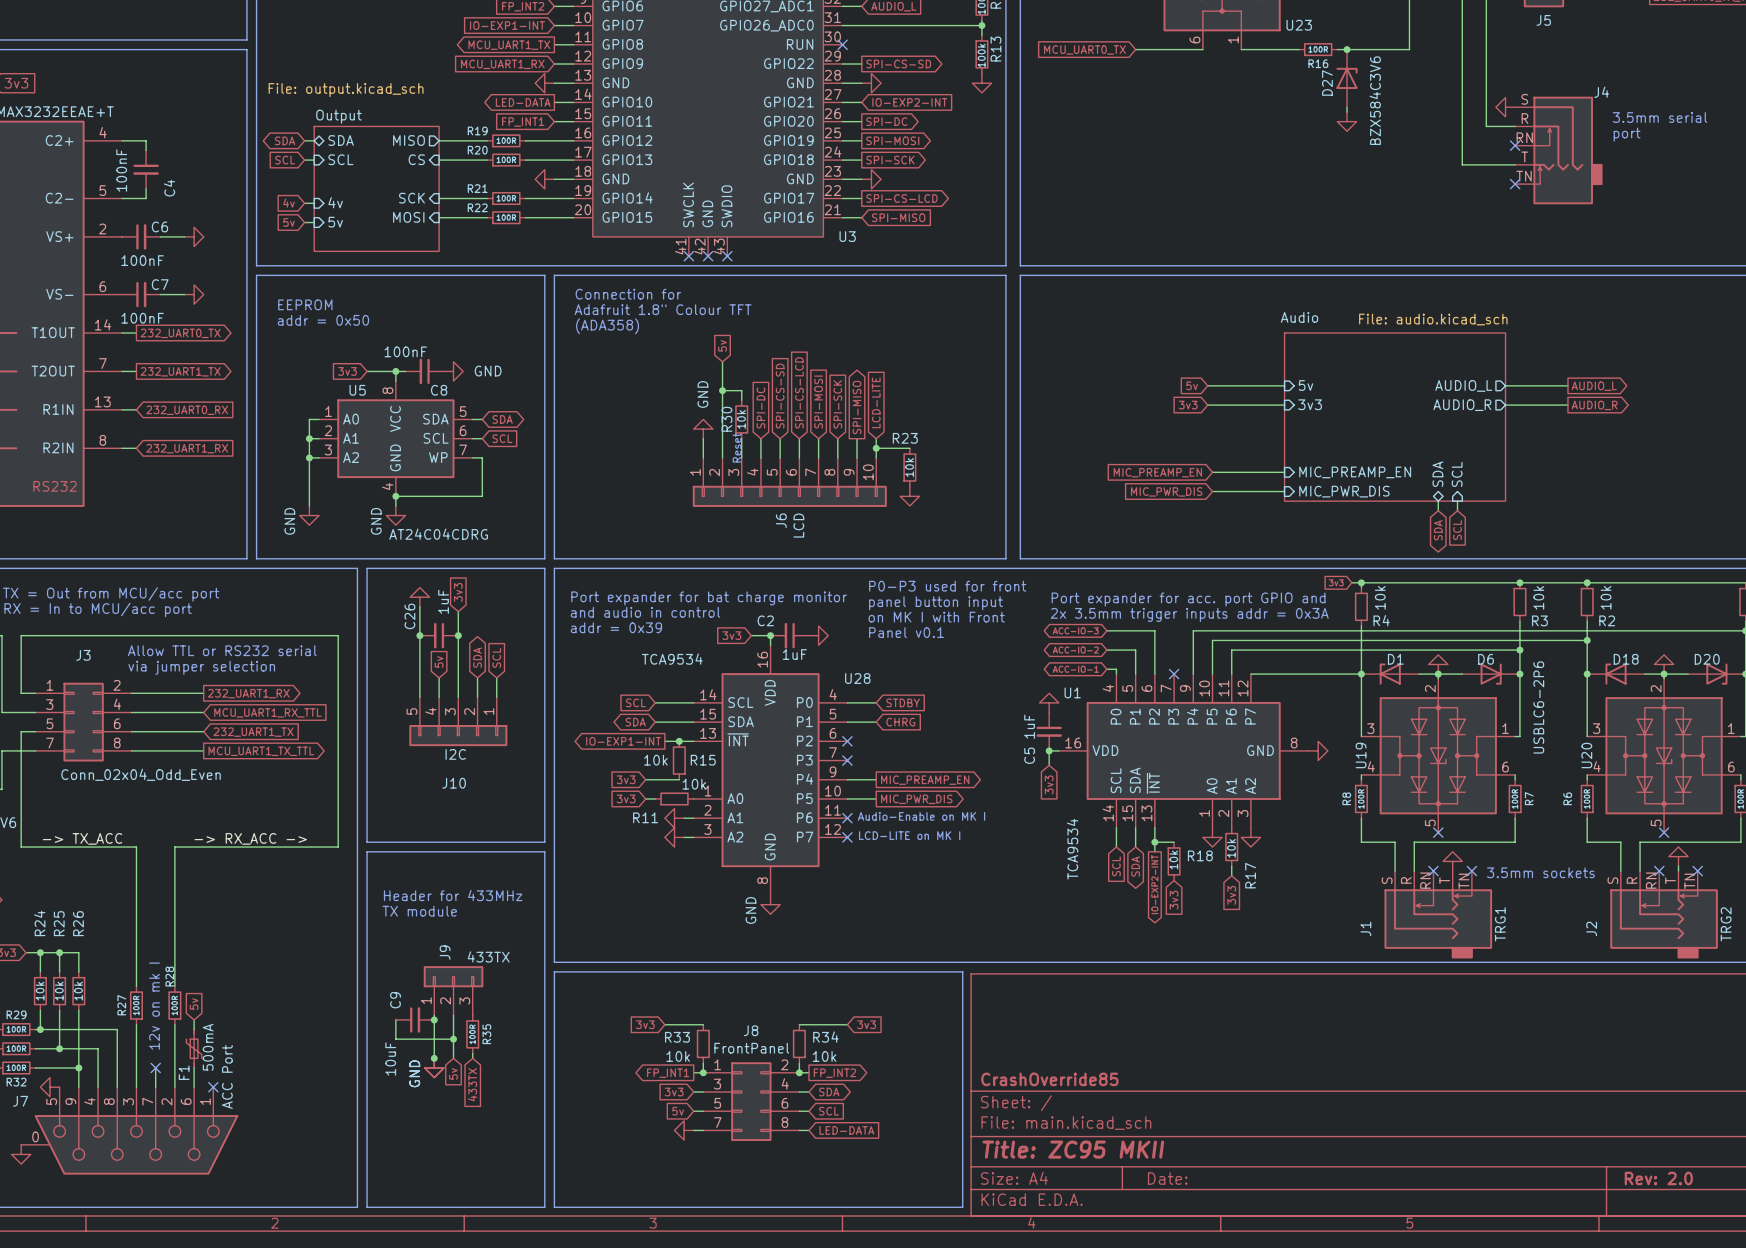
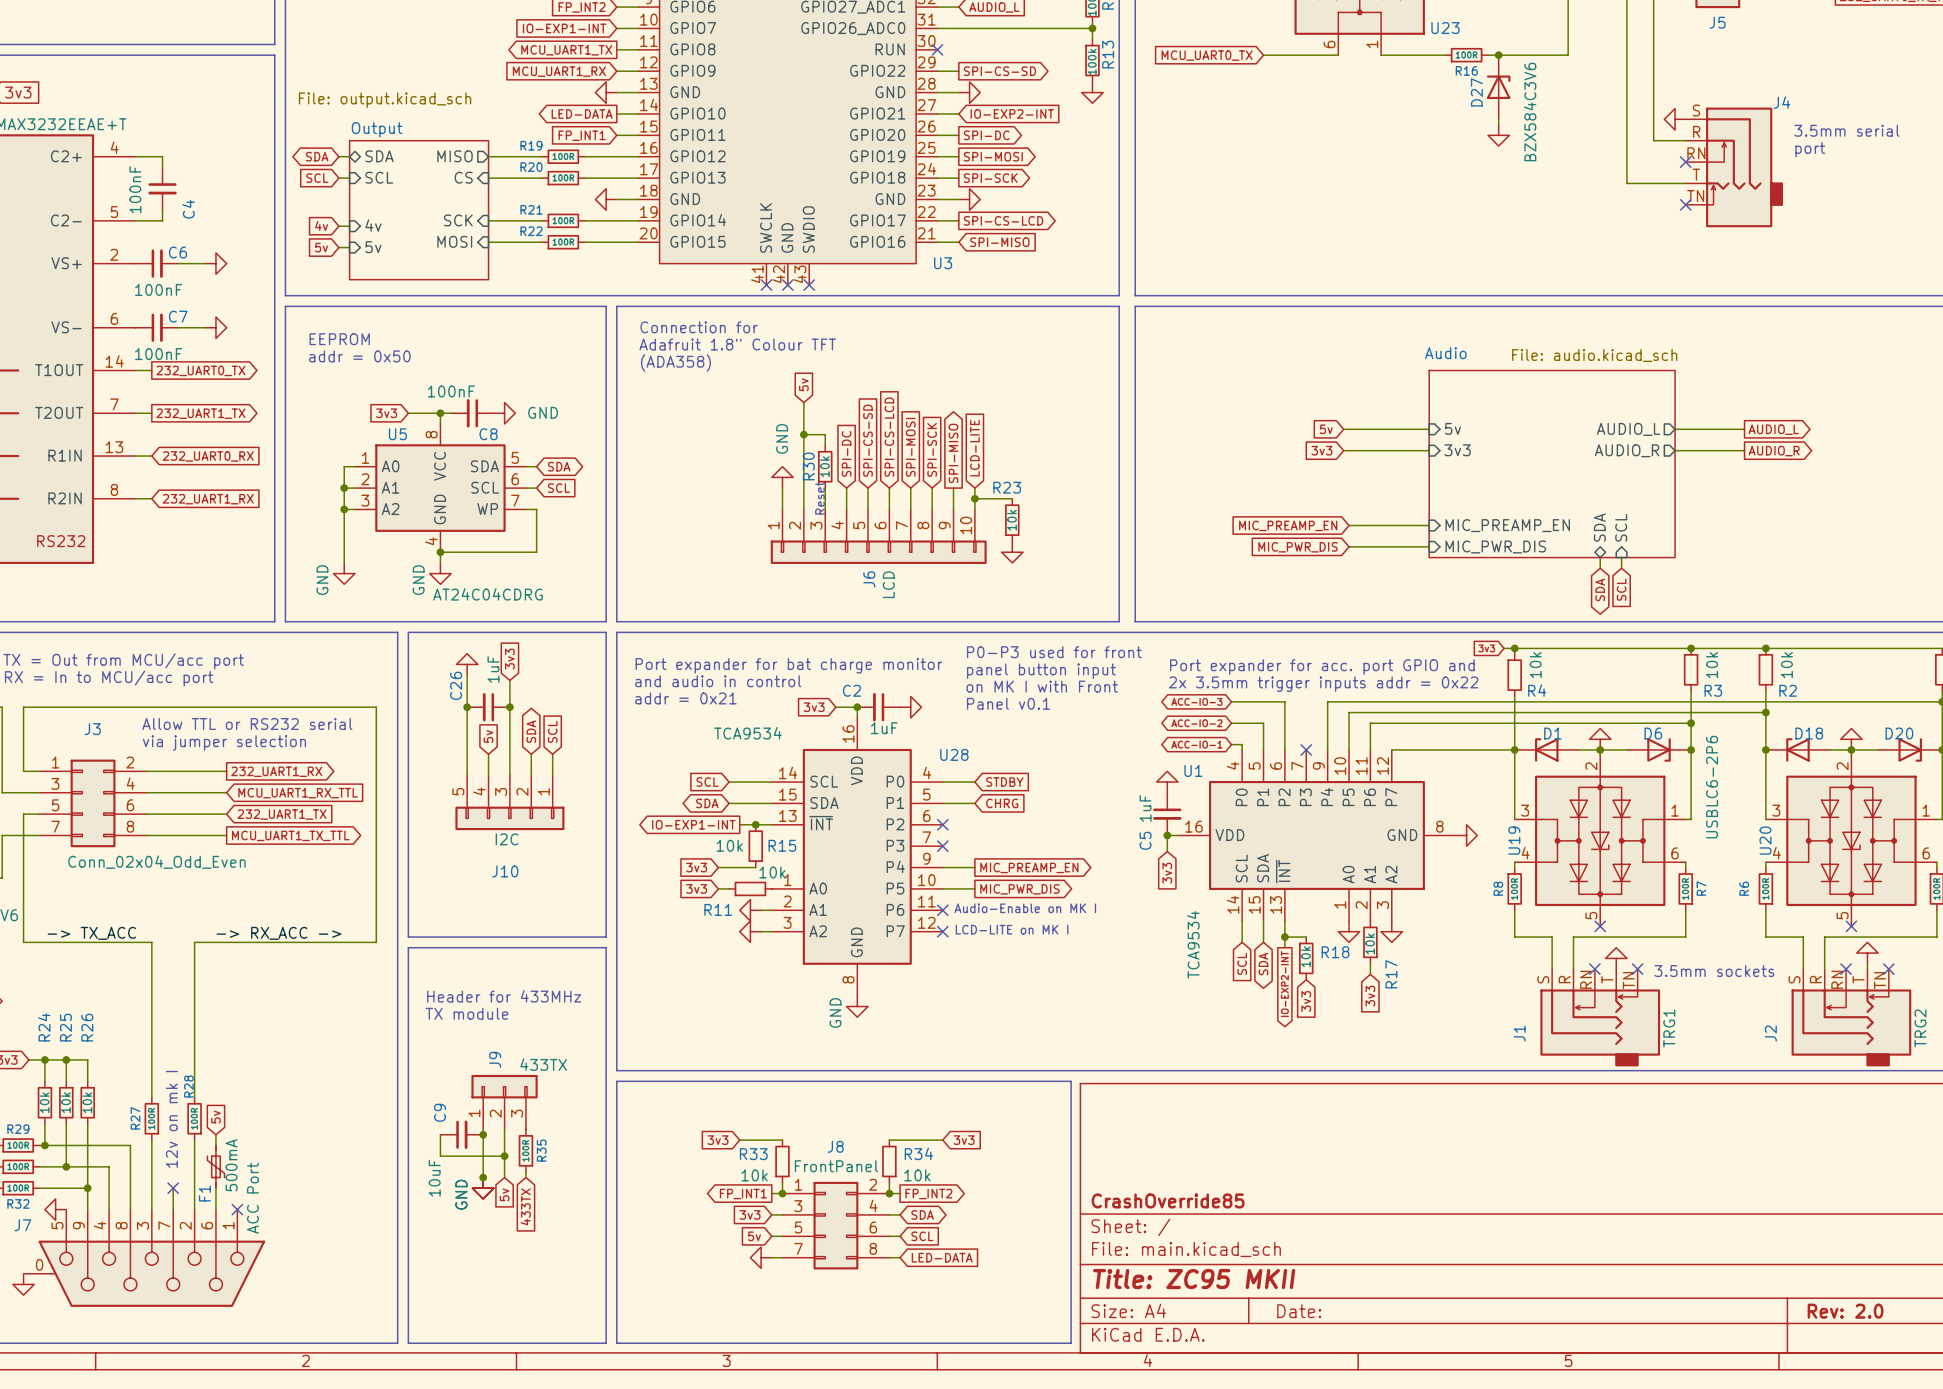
text: 2x 3.5mm trigger inputs addr = 0x3A (1189, 614) -> 2x 3.5mm trigger inputs addr = 0x22 (1323, 684)
text: addr = 0x39 (616, 627) -> addr = 0x21 (685, 698)

